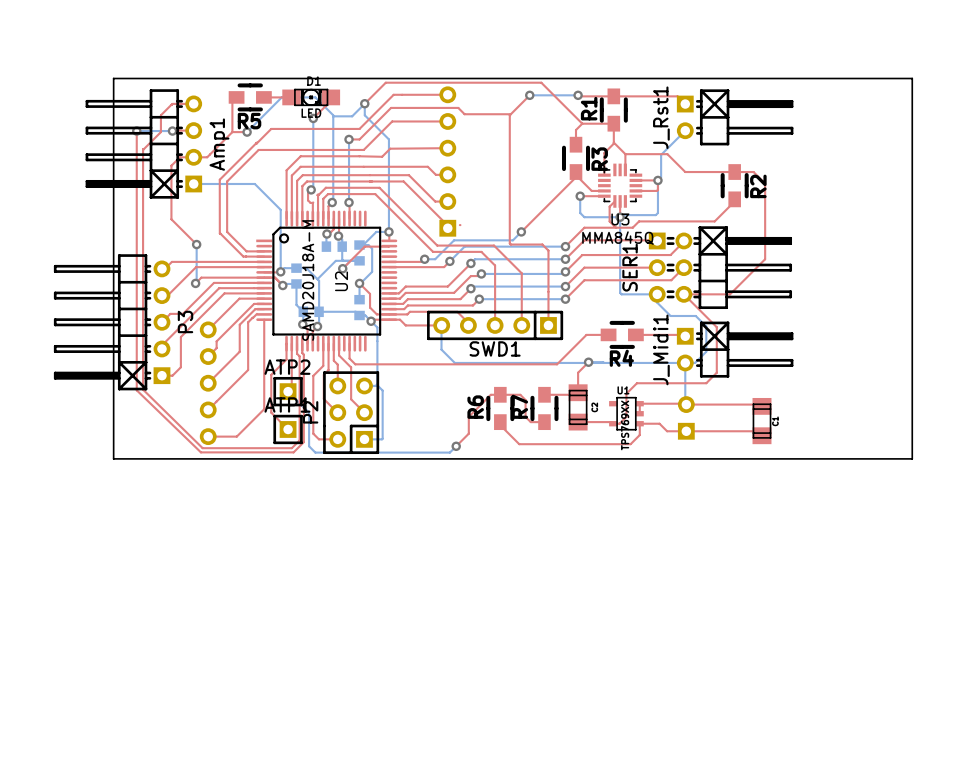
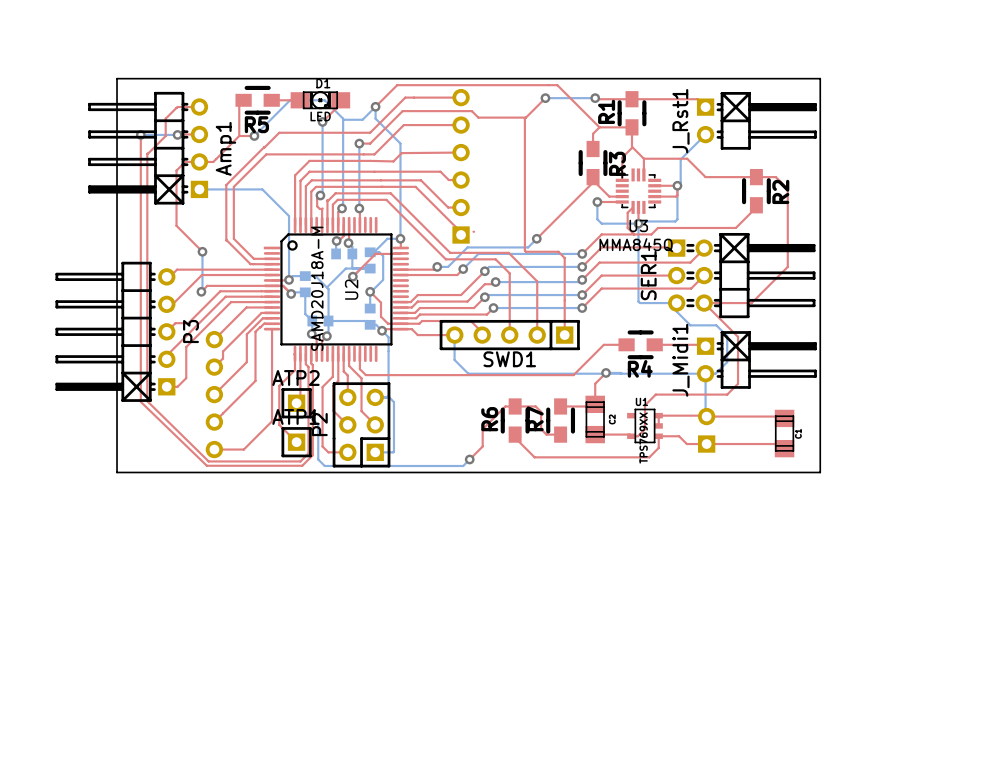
board edge: (113, 78) (912, 78) (912, 458) (796, 458) -> (117, 80) (117, 78) (820, 78) (820, 472)

